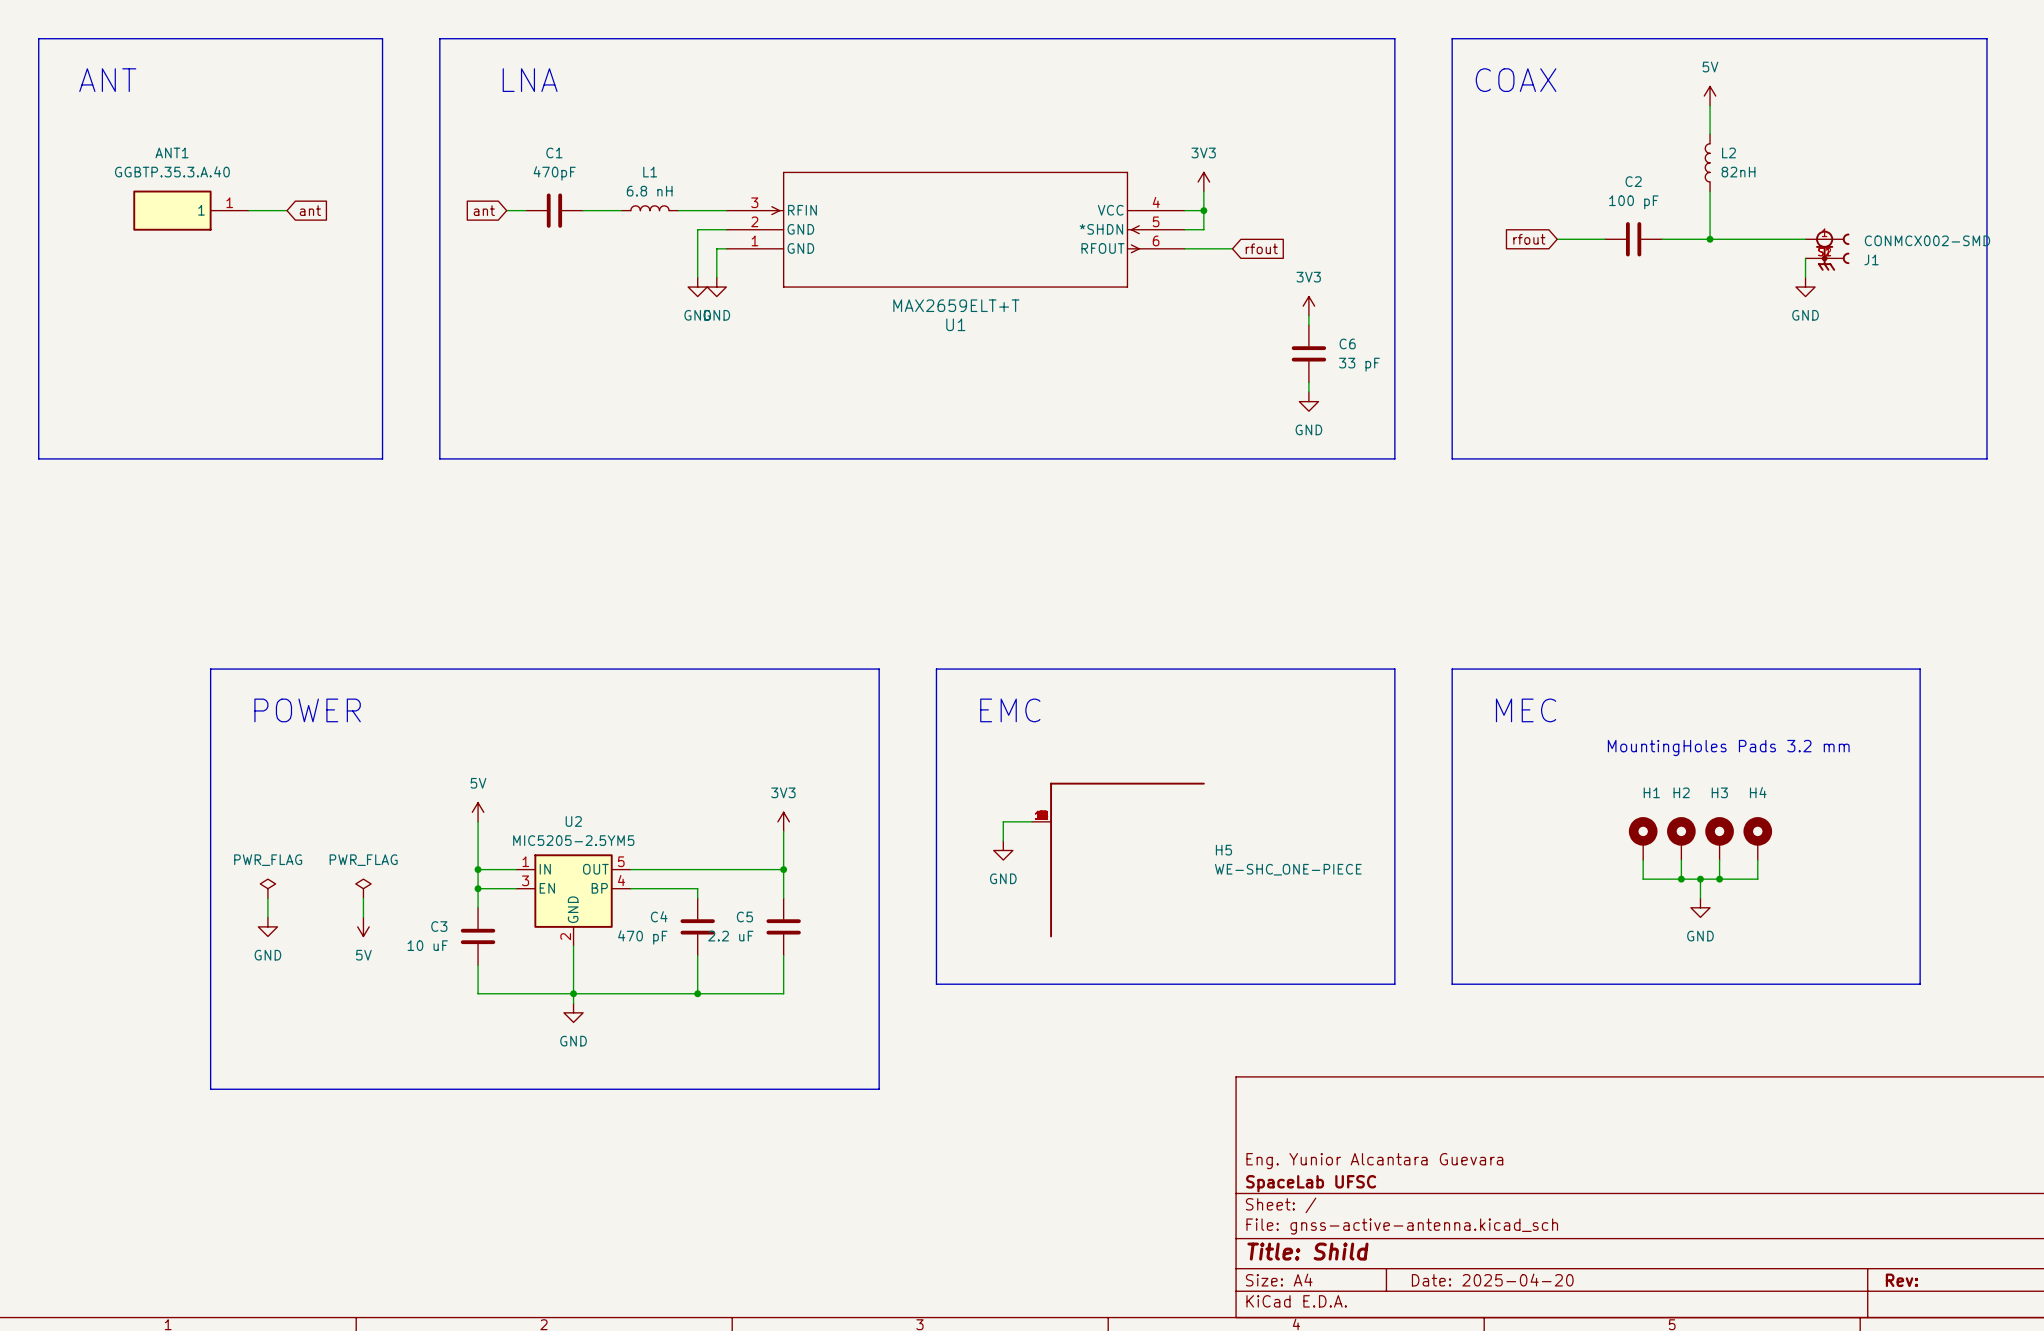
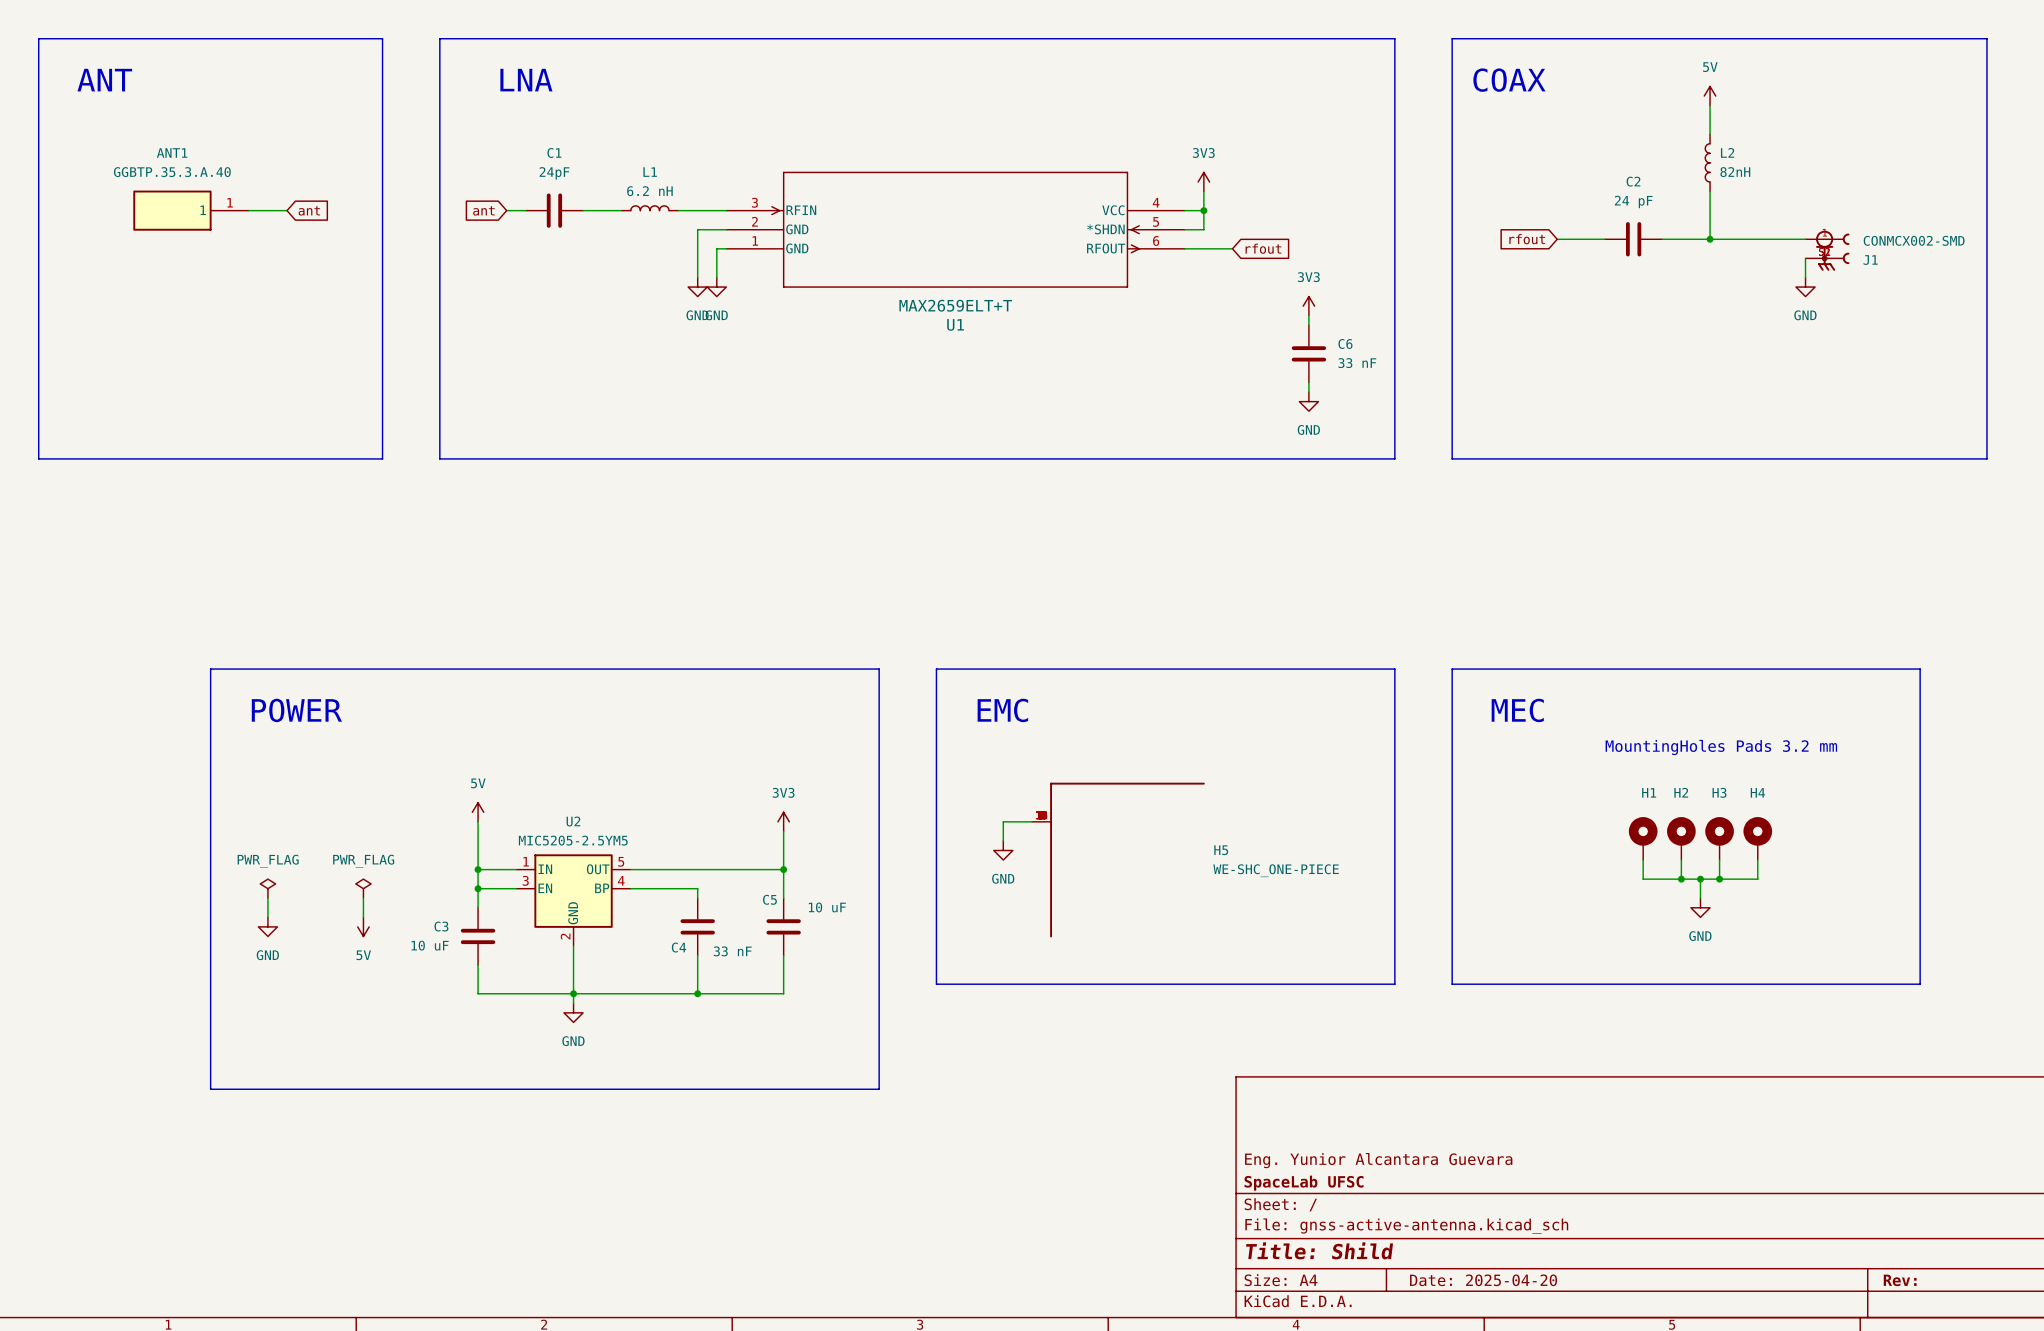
C1 value: 470pF (554, 173) -> 24pF (554, 173)
L1 value: 6.8 nH (649, 191) -> 6.2 nH (649, 191)
C2 value: 100 pF (1633, 202) -> 24 pF (1633, 202)
C6 value: 33 pF (1359, 364) -> 33 nF (1357, 363)
C4 name position: C4 (659, 916) -> C4 (678, 947)
C5 name position: C5 (744, 916) -> C5 (769, 899)
C5 value: 2.2 uF (730, 936) -> 10 uF (827, 907)
C4 value: 470 pF (642, 937) -> 33 nF (732, 951)

